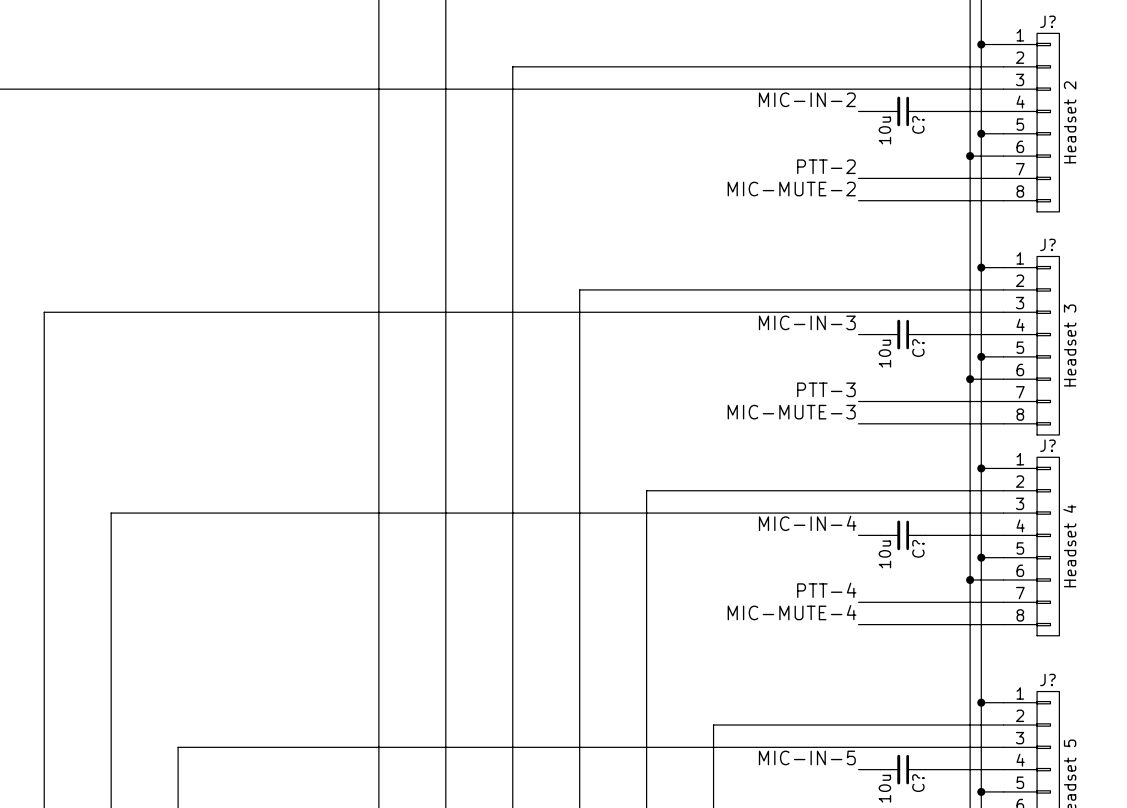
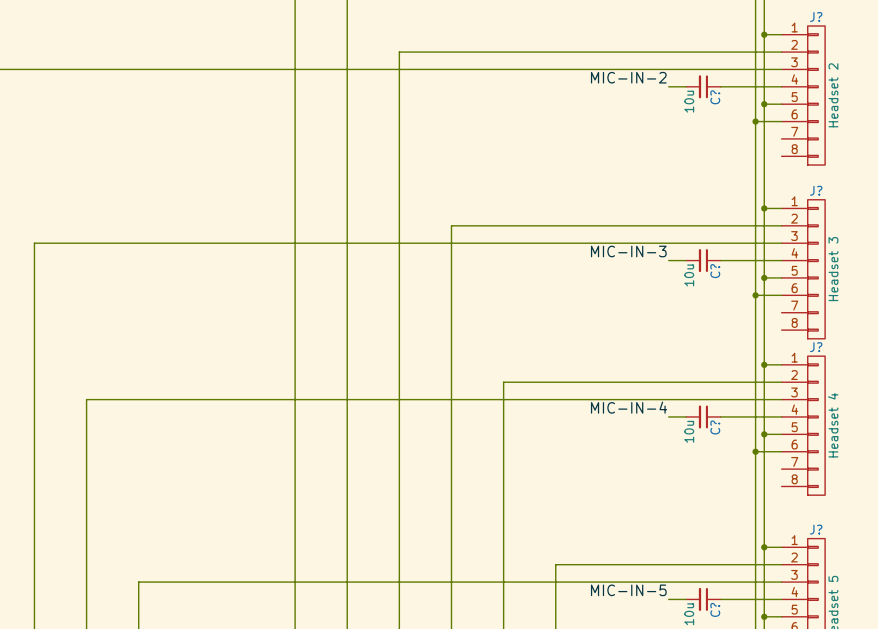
label: PTT-2 (826, 166) -> none
wire: (858, 178) (1003, 178) -> none
label: MIC-MUTE-2 (791, 189) -> none
wire: (858, 200) (1003, 200) -> none
label: PTT-3 (826, 389) -> none
wire: (858, 401) (1003, 401) -> none
label: MIC-MUTE-3 (791, 412) -> none
wire: (858, 423) (1003, 423) -> none
label: PTT-4 (826, 590) -> none
wire: (858, 602) (1003, 602) -> none
label: MIC-MUTE-4 (792, 612) -> none
wire: (858, 624) (1003, 624) -> none

